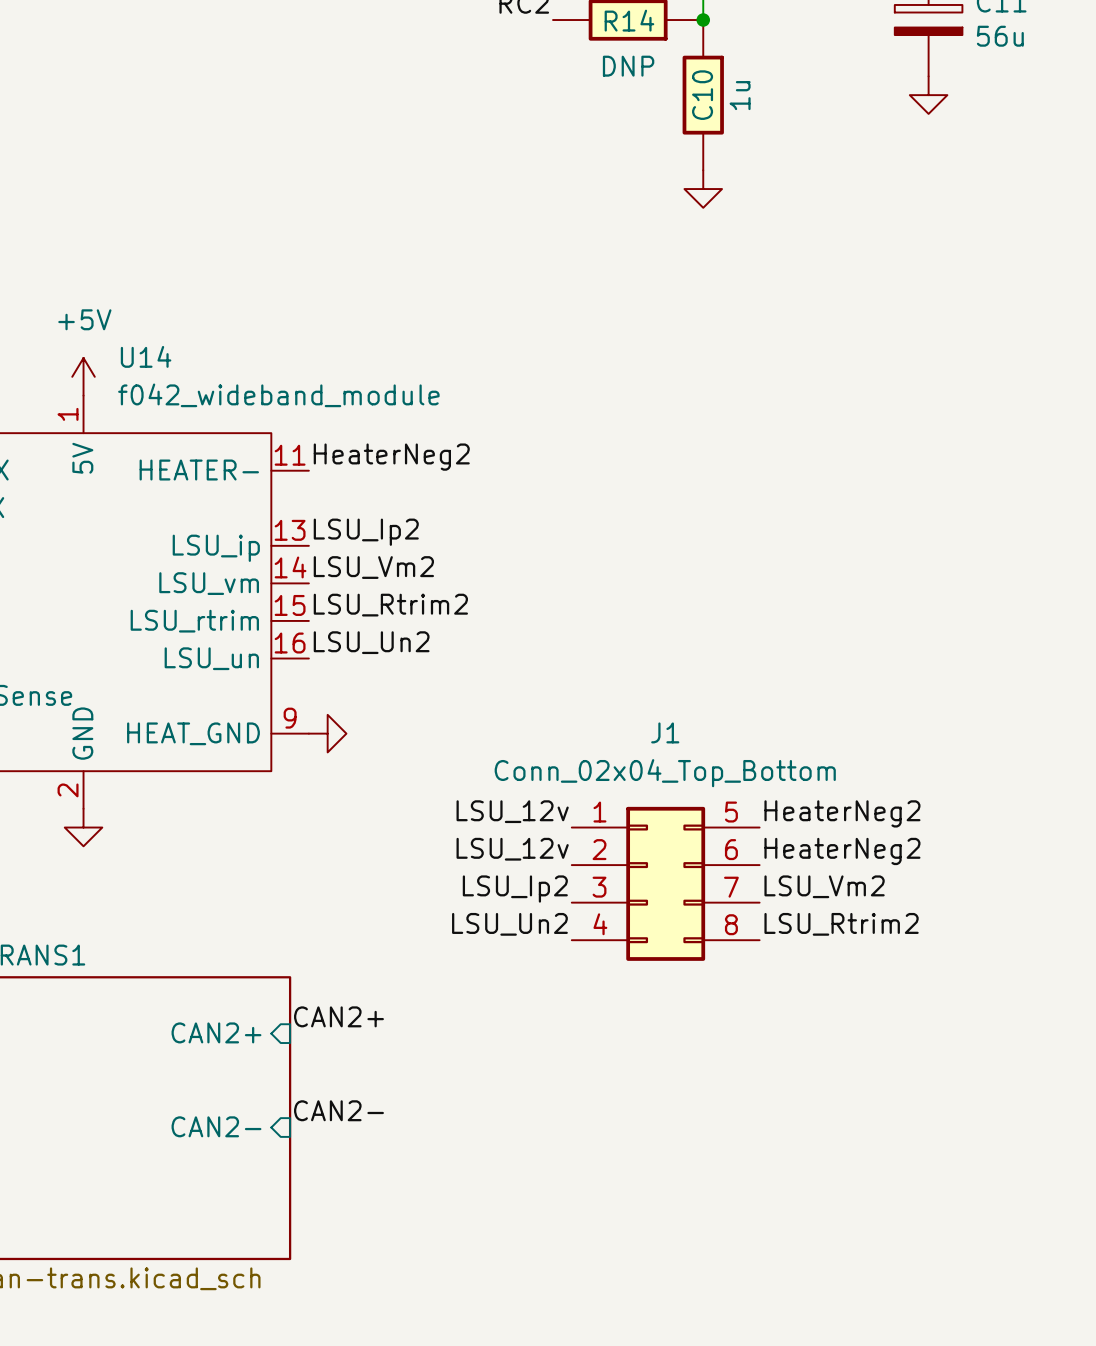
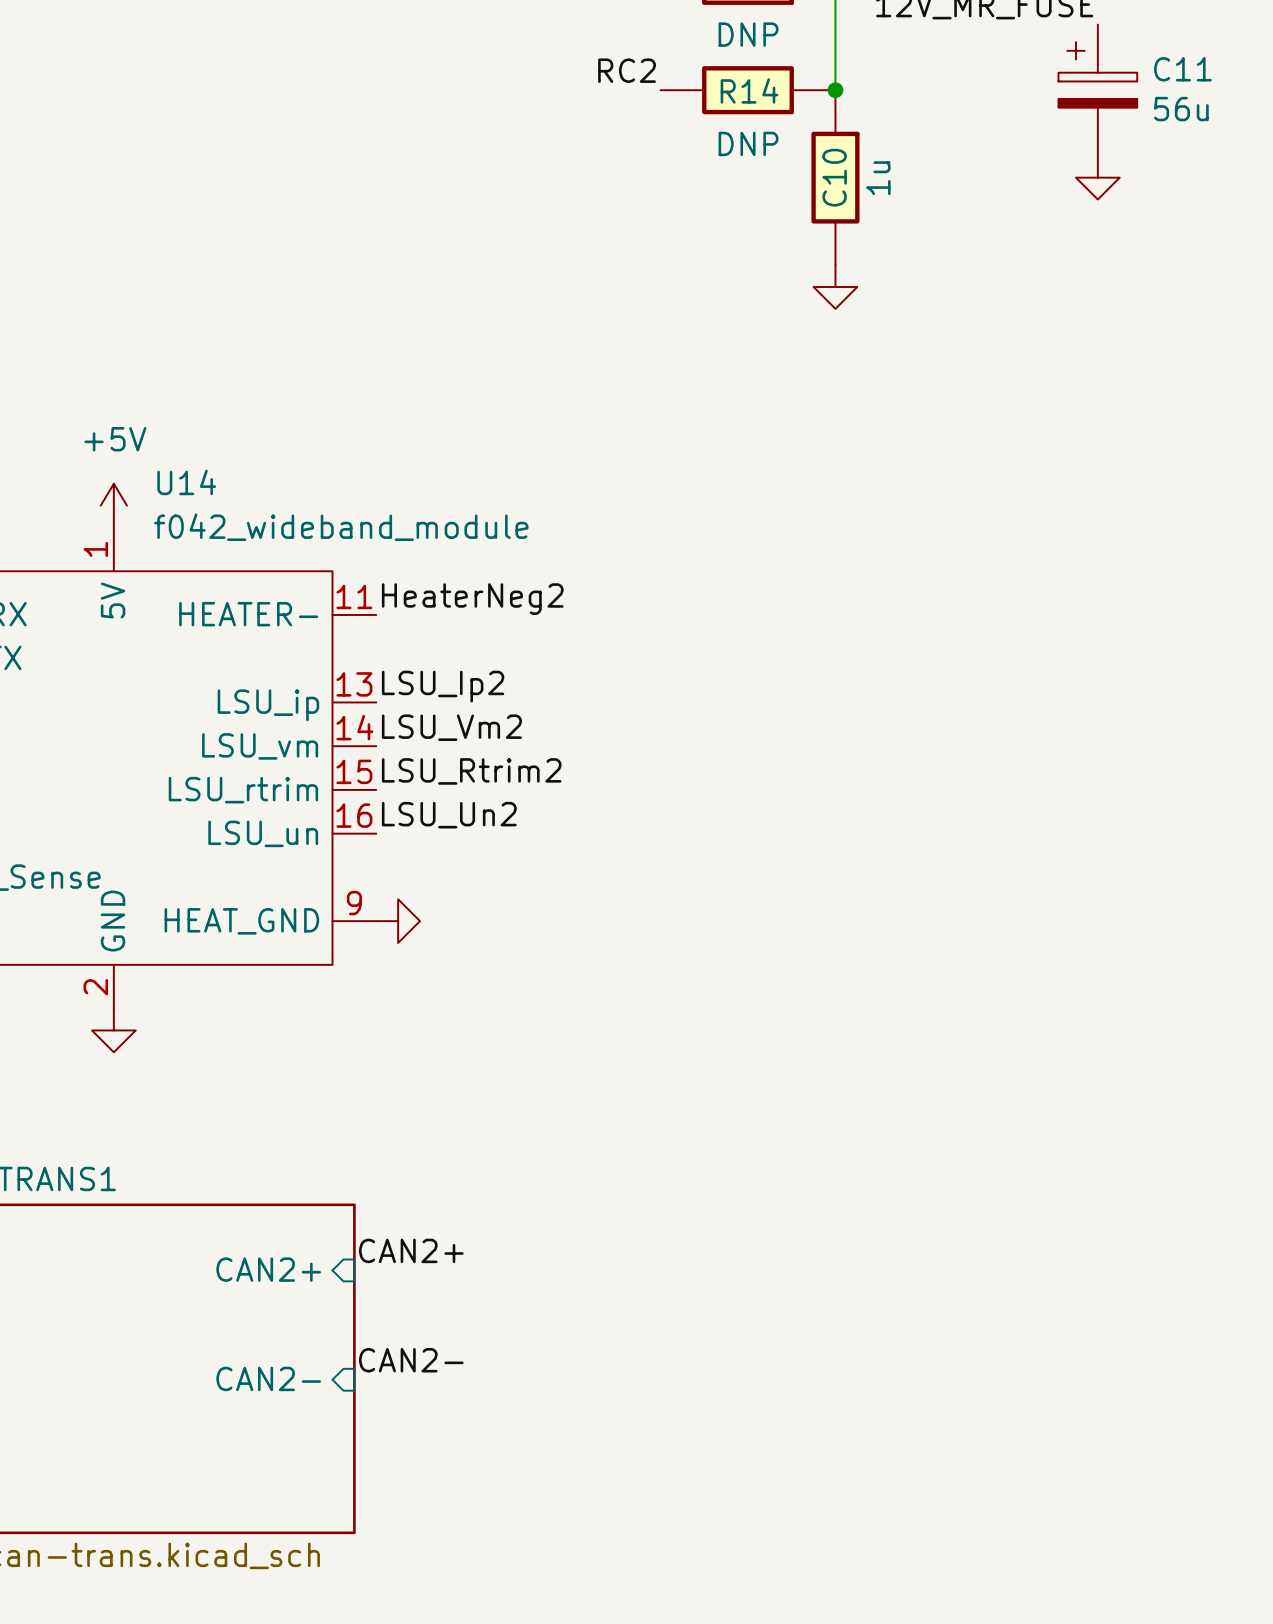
label: LSU_12v (512, 811) -> none
label: HeaterNeg2 (842, 813) -> none
label: LSU_12v (512, 849) -> none
label: HeaterNeg2 (842, 851) -> none
J1: Conn_02x04_Top_Bottom (665, 883) -> none
label: LSU_Vm2 (824, 886) -> none
label: LSU_Ip2 (515, 889) -> none
label: LSU_Un2 (509, 924) -> none
label: LSU_Rtrim2 (841, 924) -> none

